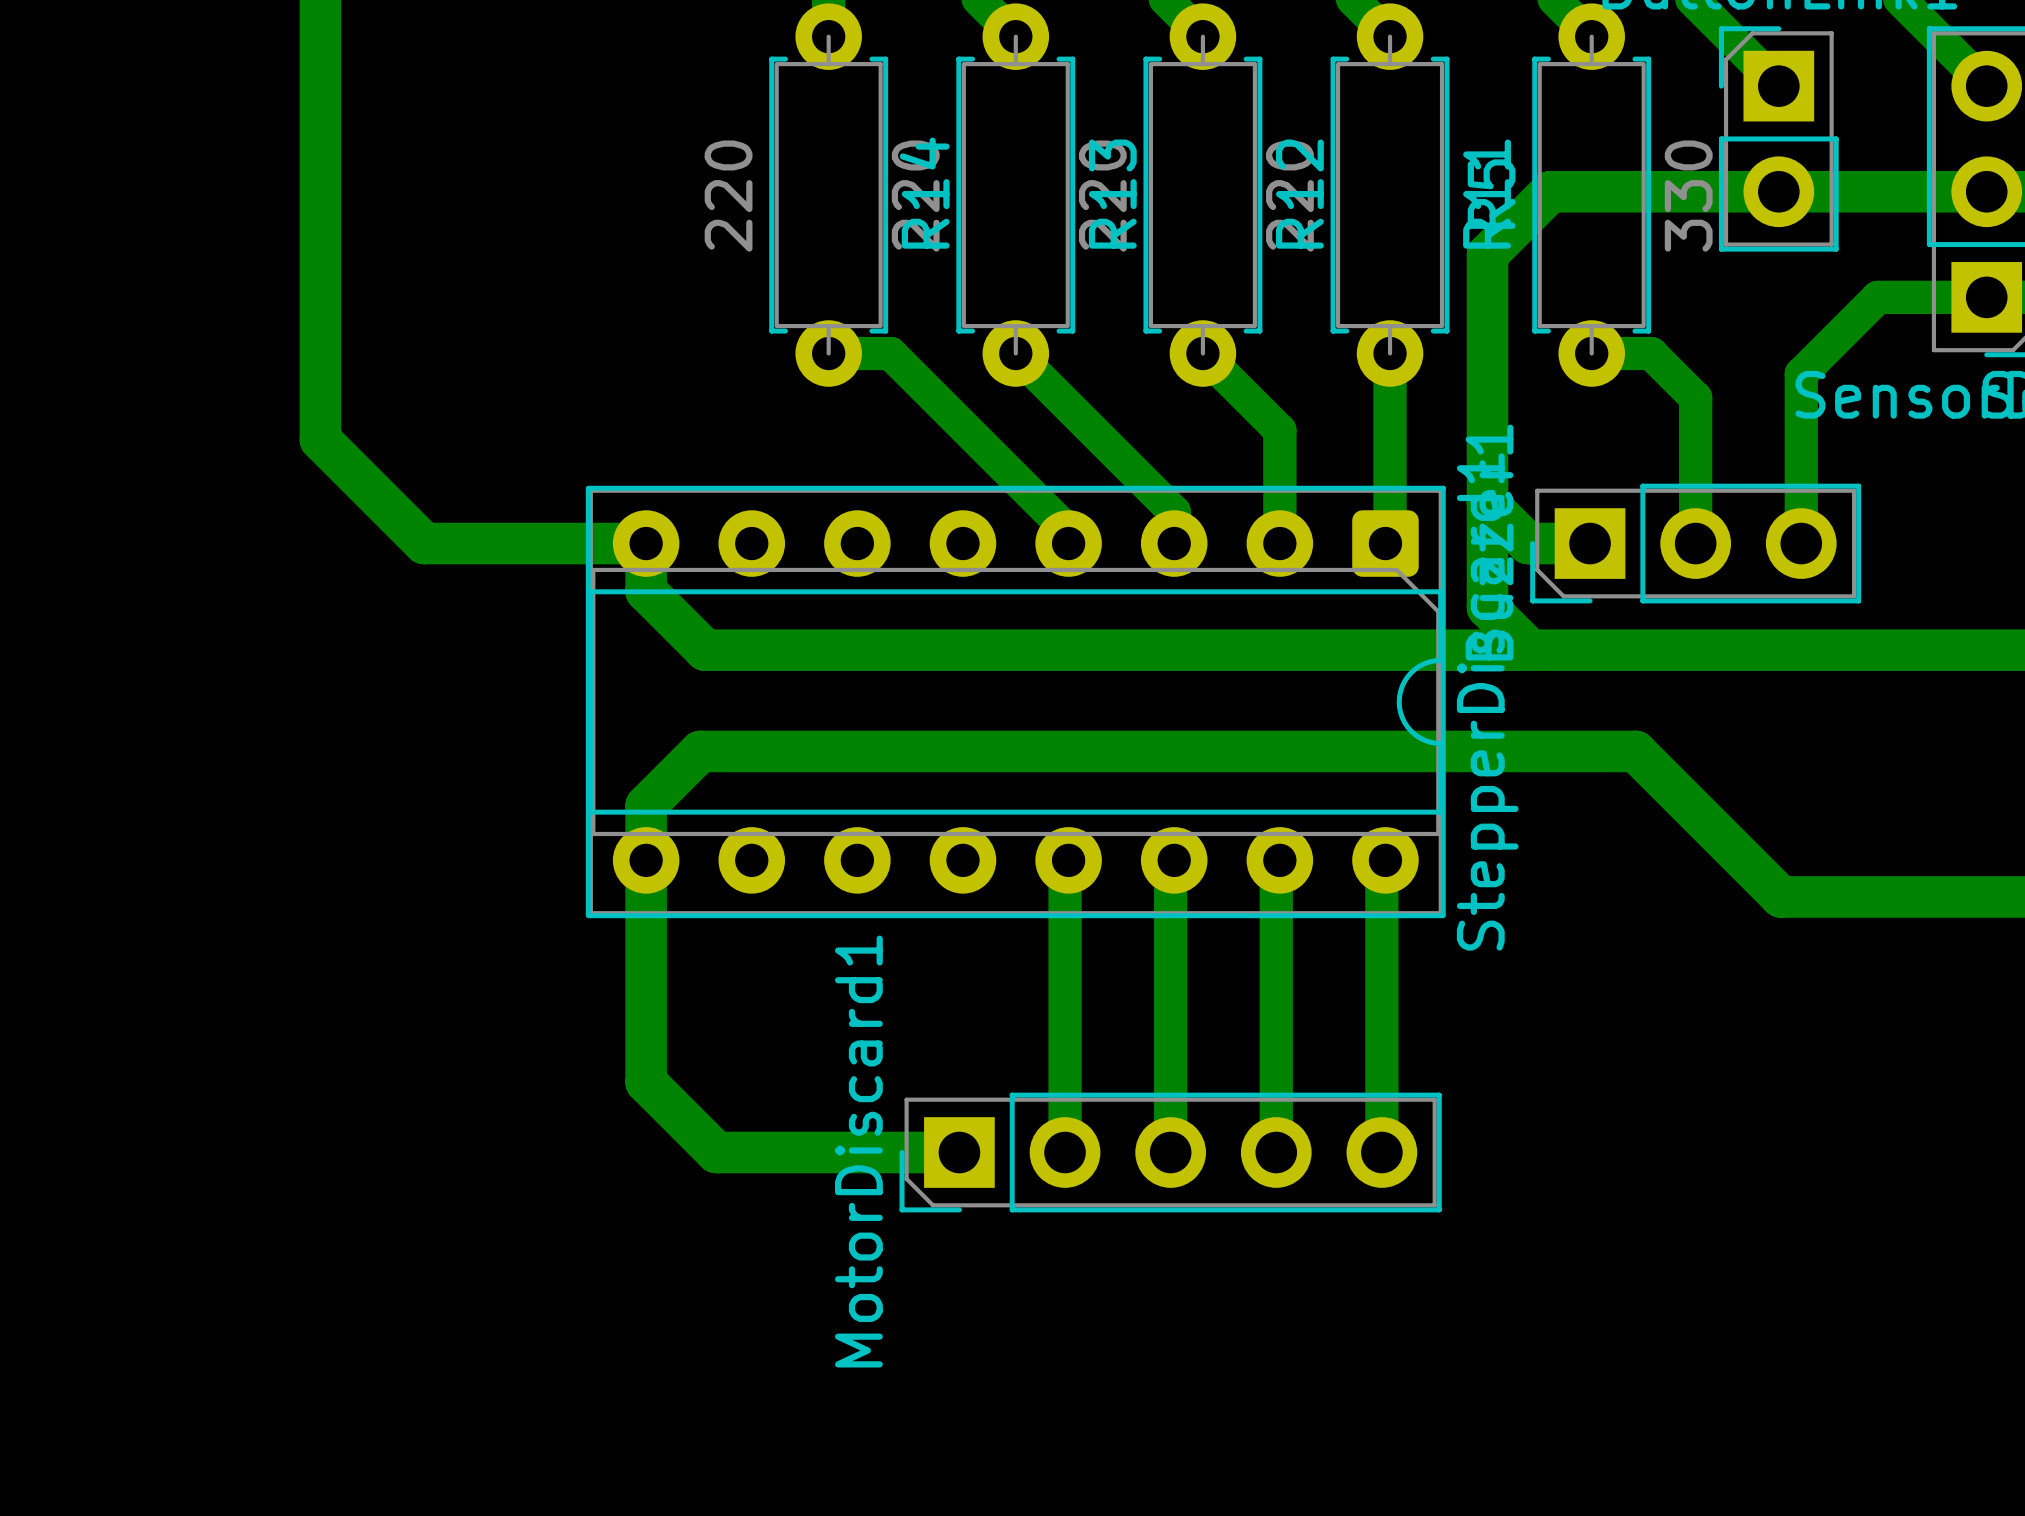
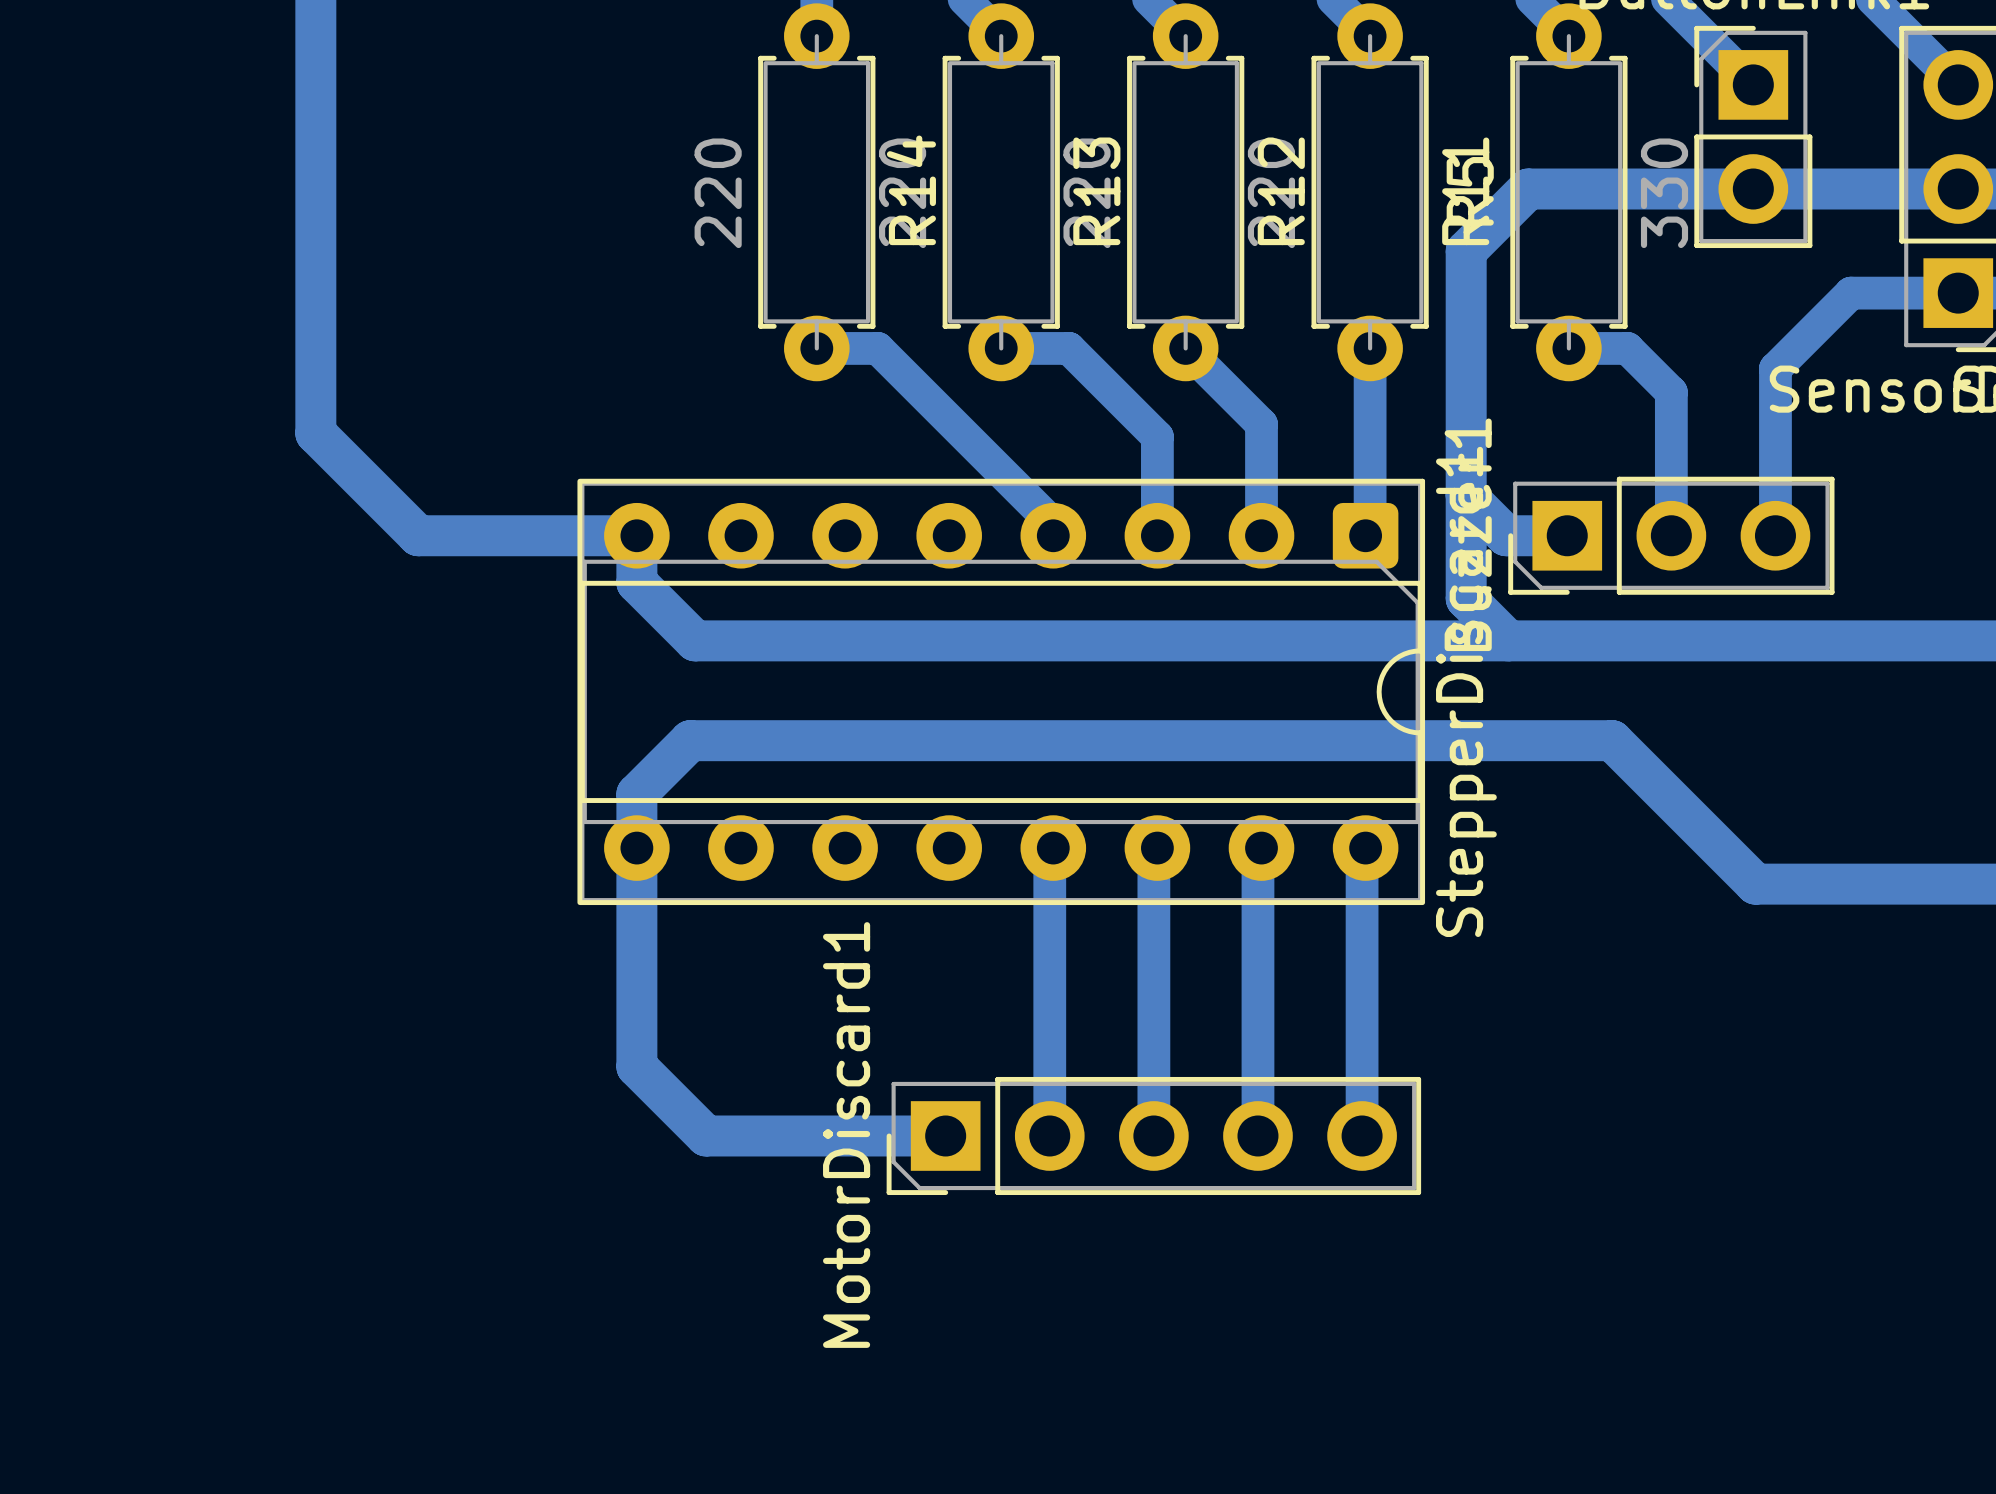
bottom track: (1015, 353) (1174, 511) -> (1001, 348) (1069, 348) (1157, 436) (1157, 504)

